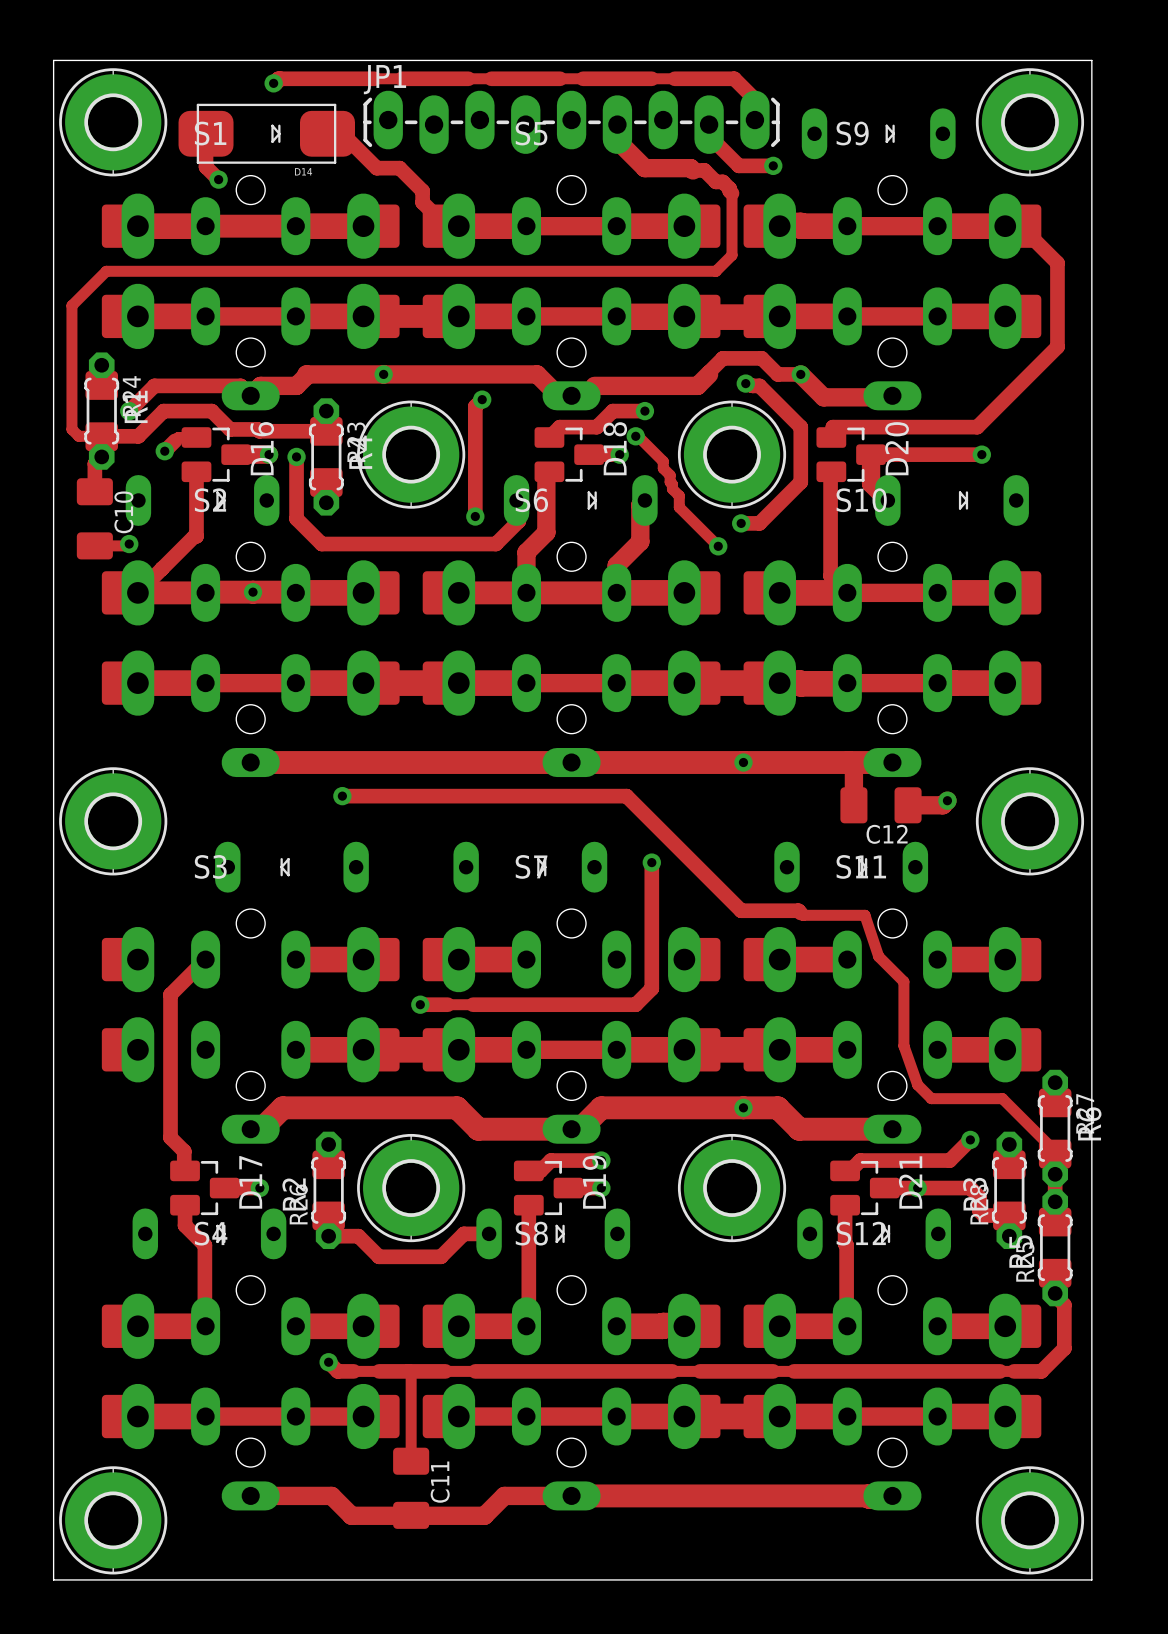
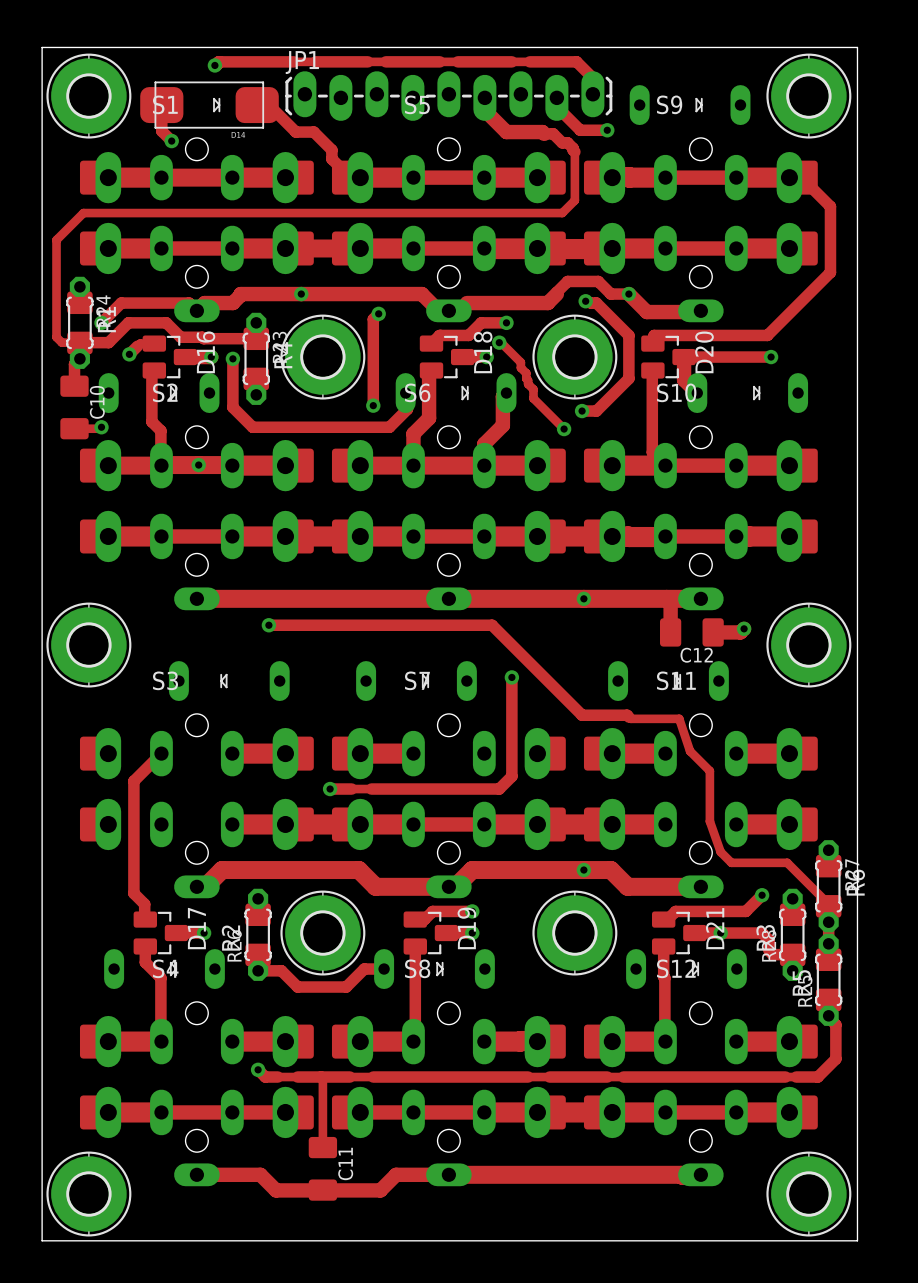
track: none -> (151, 370) (151, 421) (160, 430) (161, 465)
track: (196, 471) (196, 536) (137, 592) -> none

